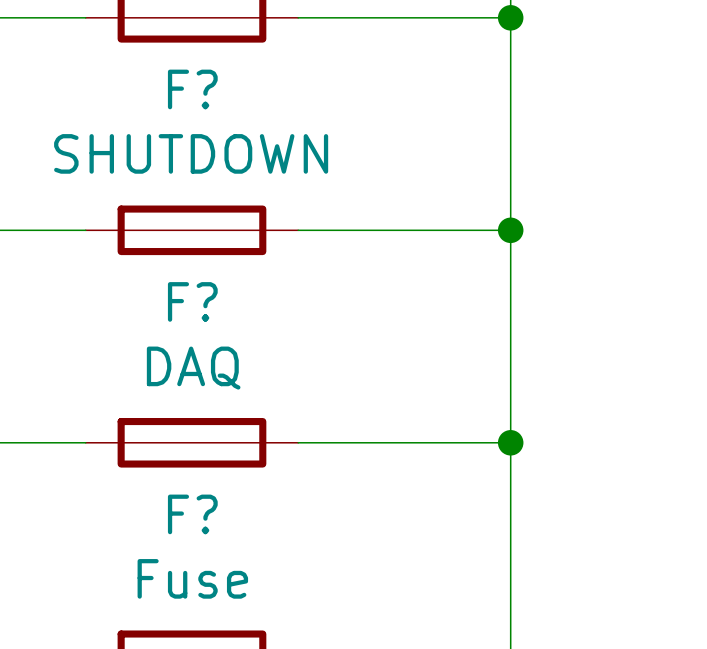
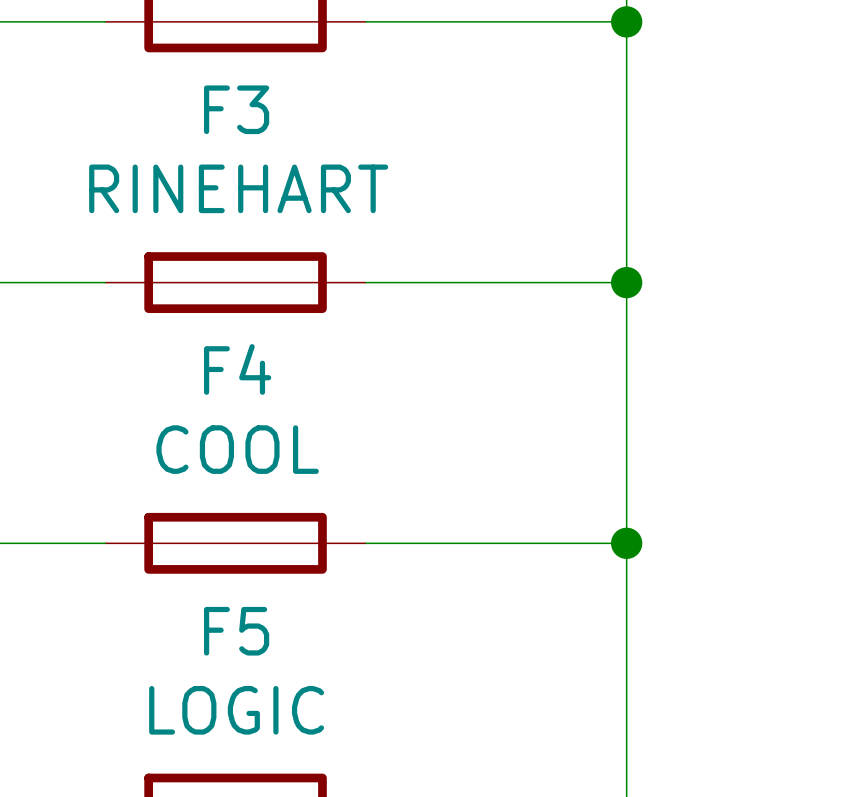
F? name: F? (192, 89) -> F3 (236, 109)
F? value: SHUTDOWN (191, 153) -> RINEHART (238, 188)
F? name: F? (192, 301) -> F4 (237, 369)
F? value: DAQ (193, 368) -> COOL (237, 449)
F? name: F? (192, 514) -> F5 (236, 631)
F? value: Fuse (192, 578) -> LOGIC (236, 710)

